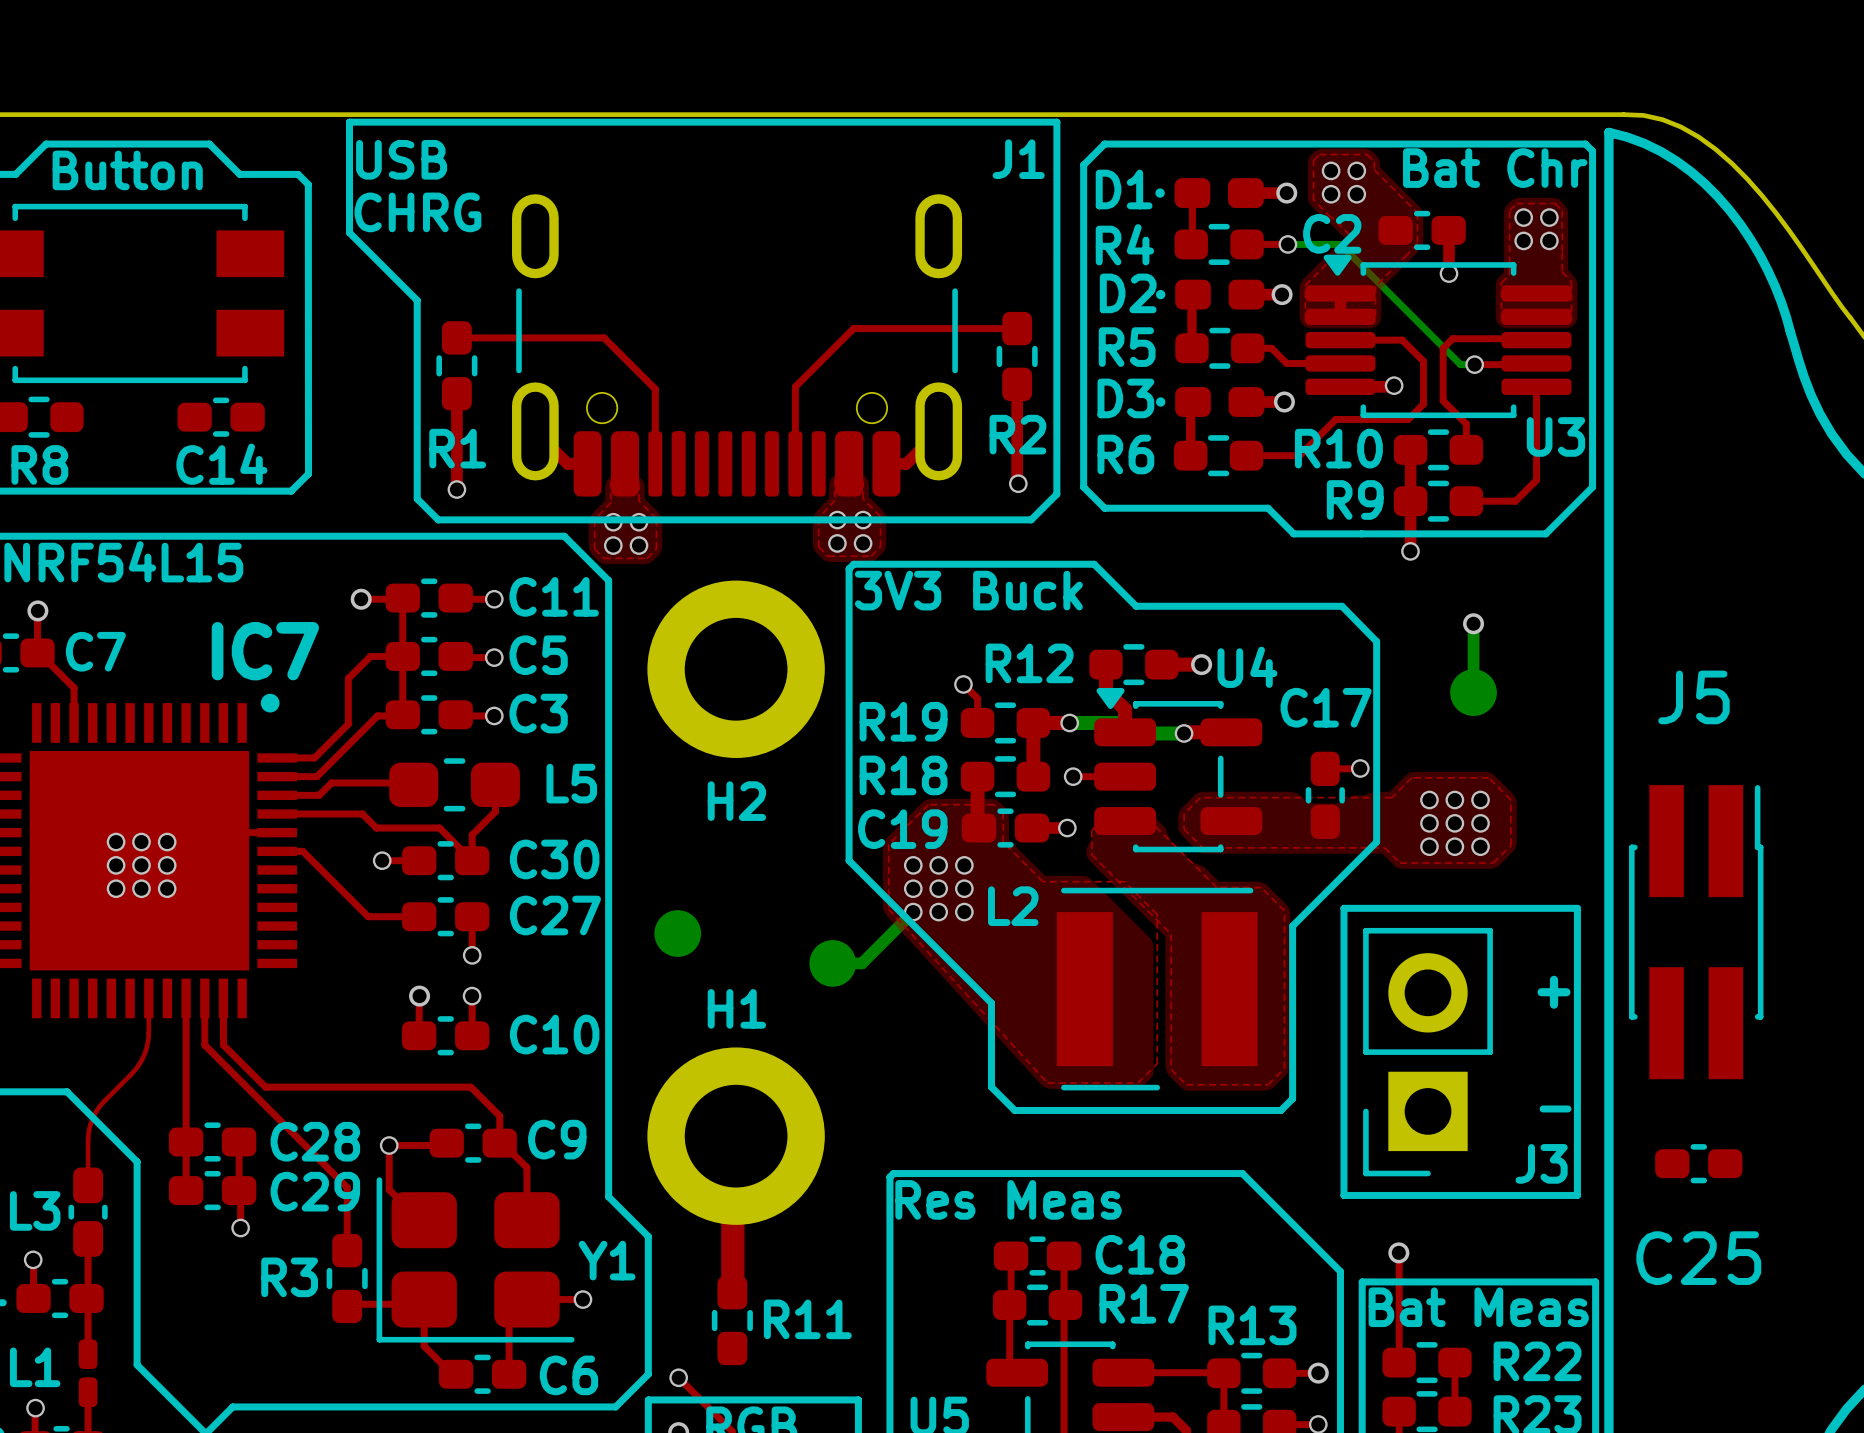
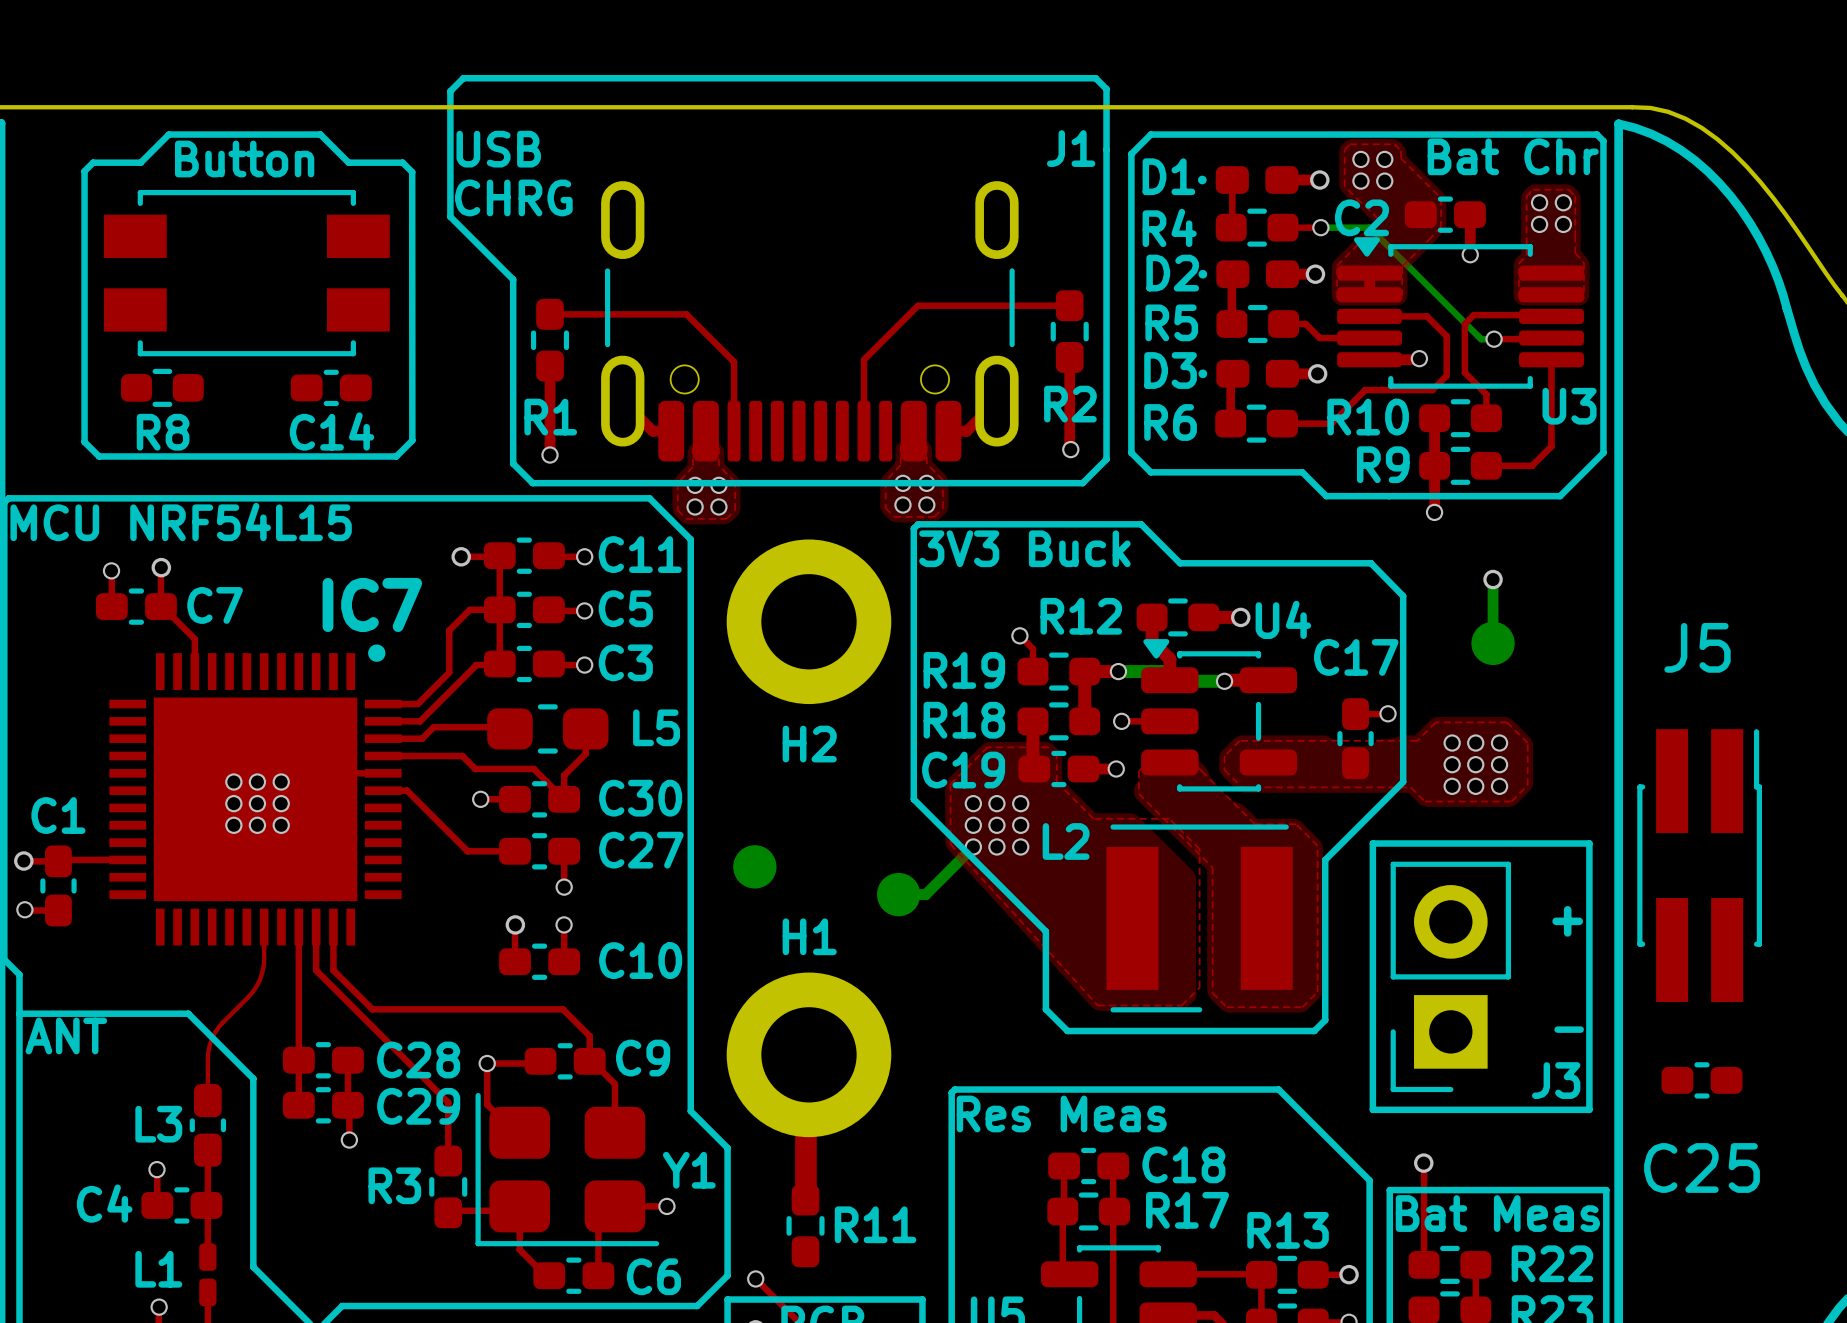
line: (349, 232) (349, 122) (1056, 122) (1056, 494) -> (450, 216) (450, 91) (463, 78) (1095, 78) (1106, 89) (1106, 459)

